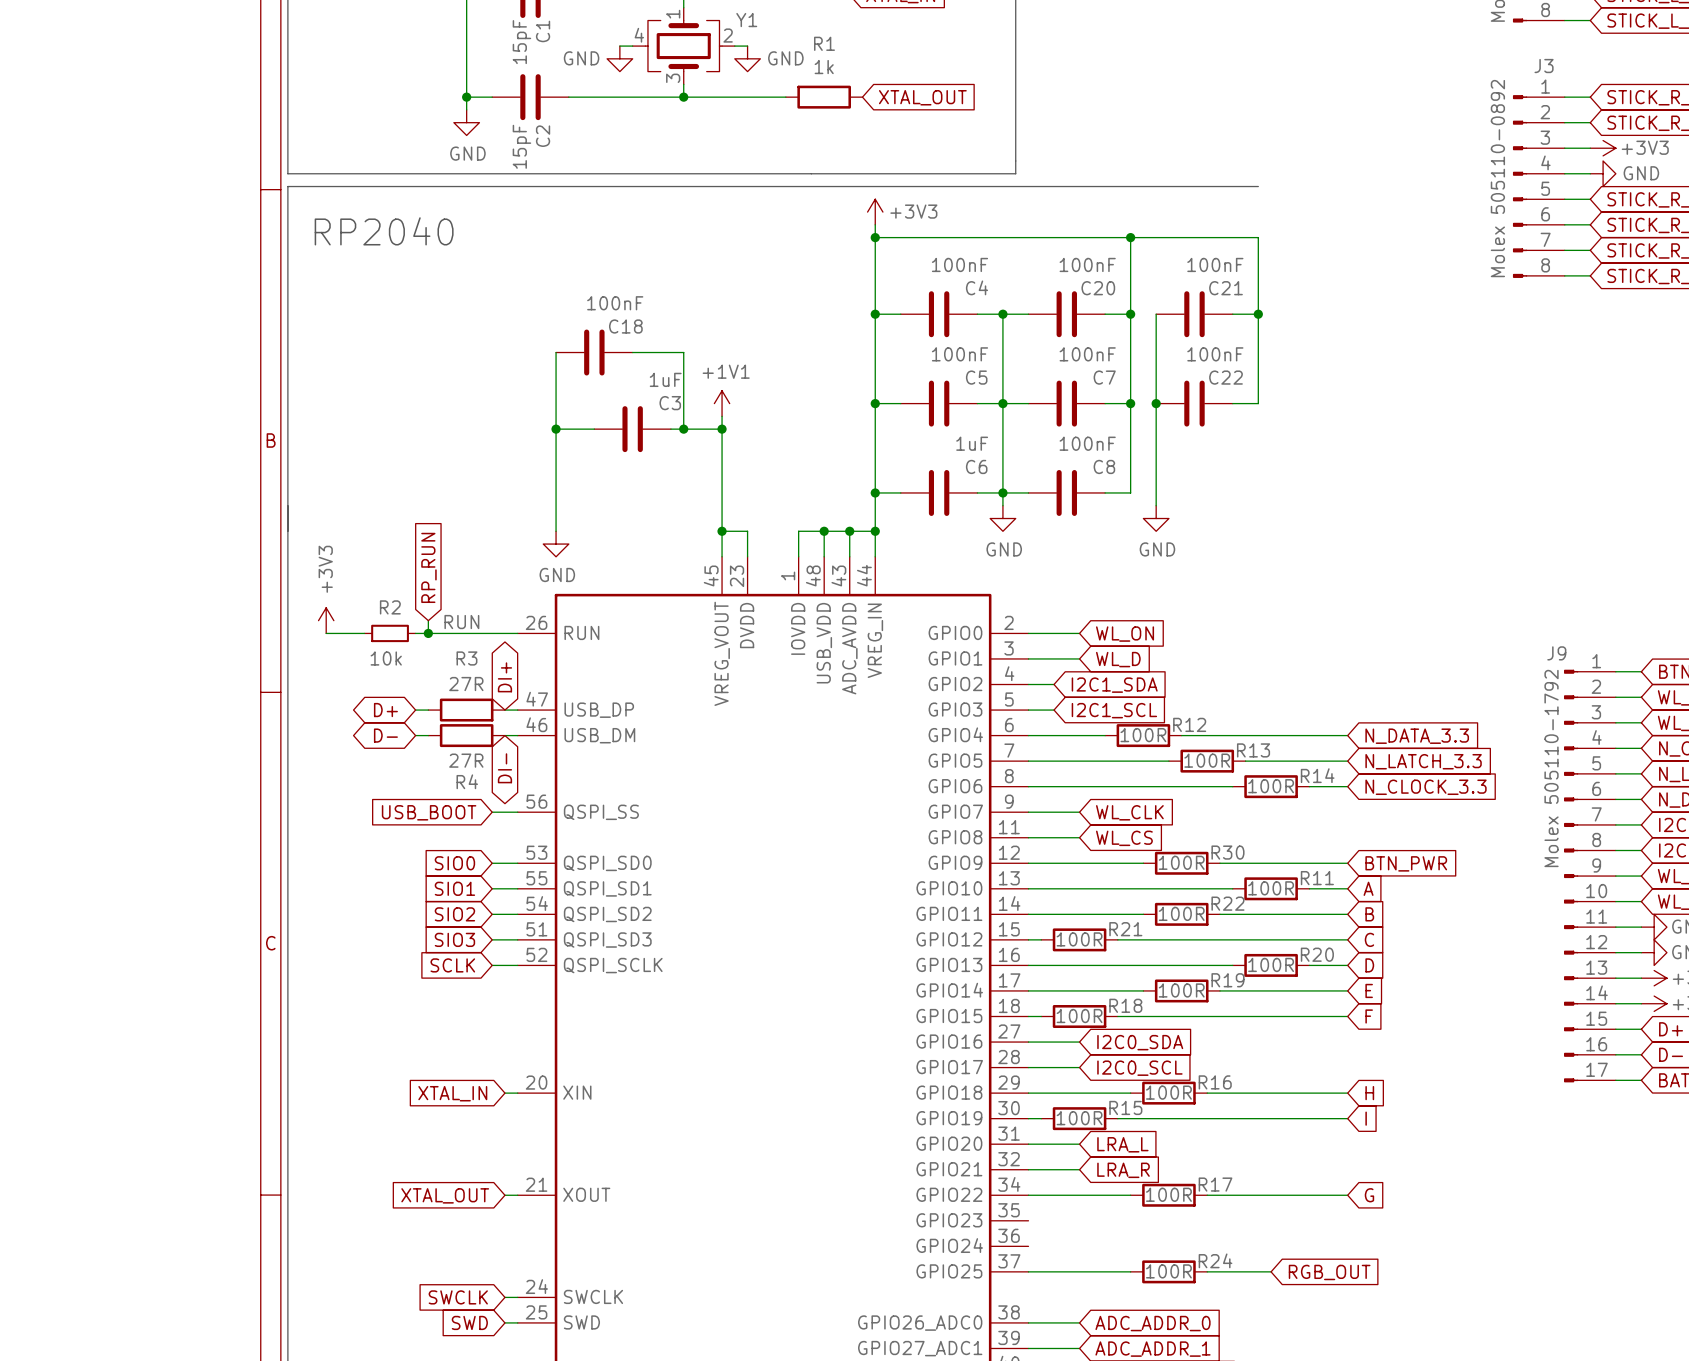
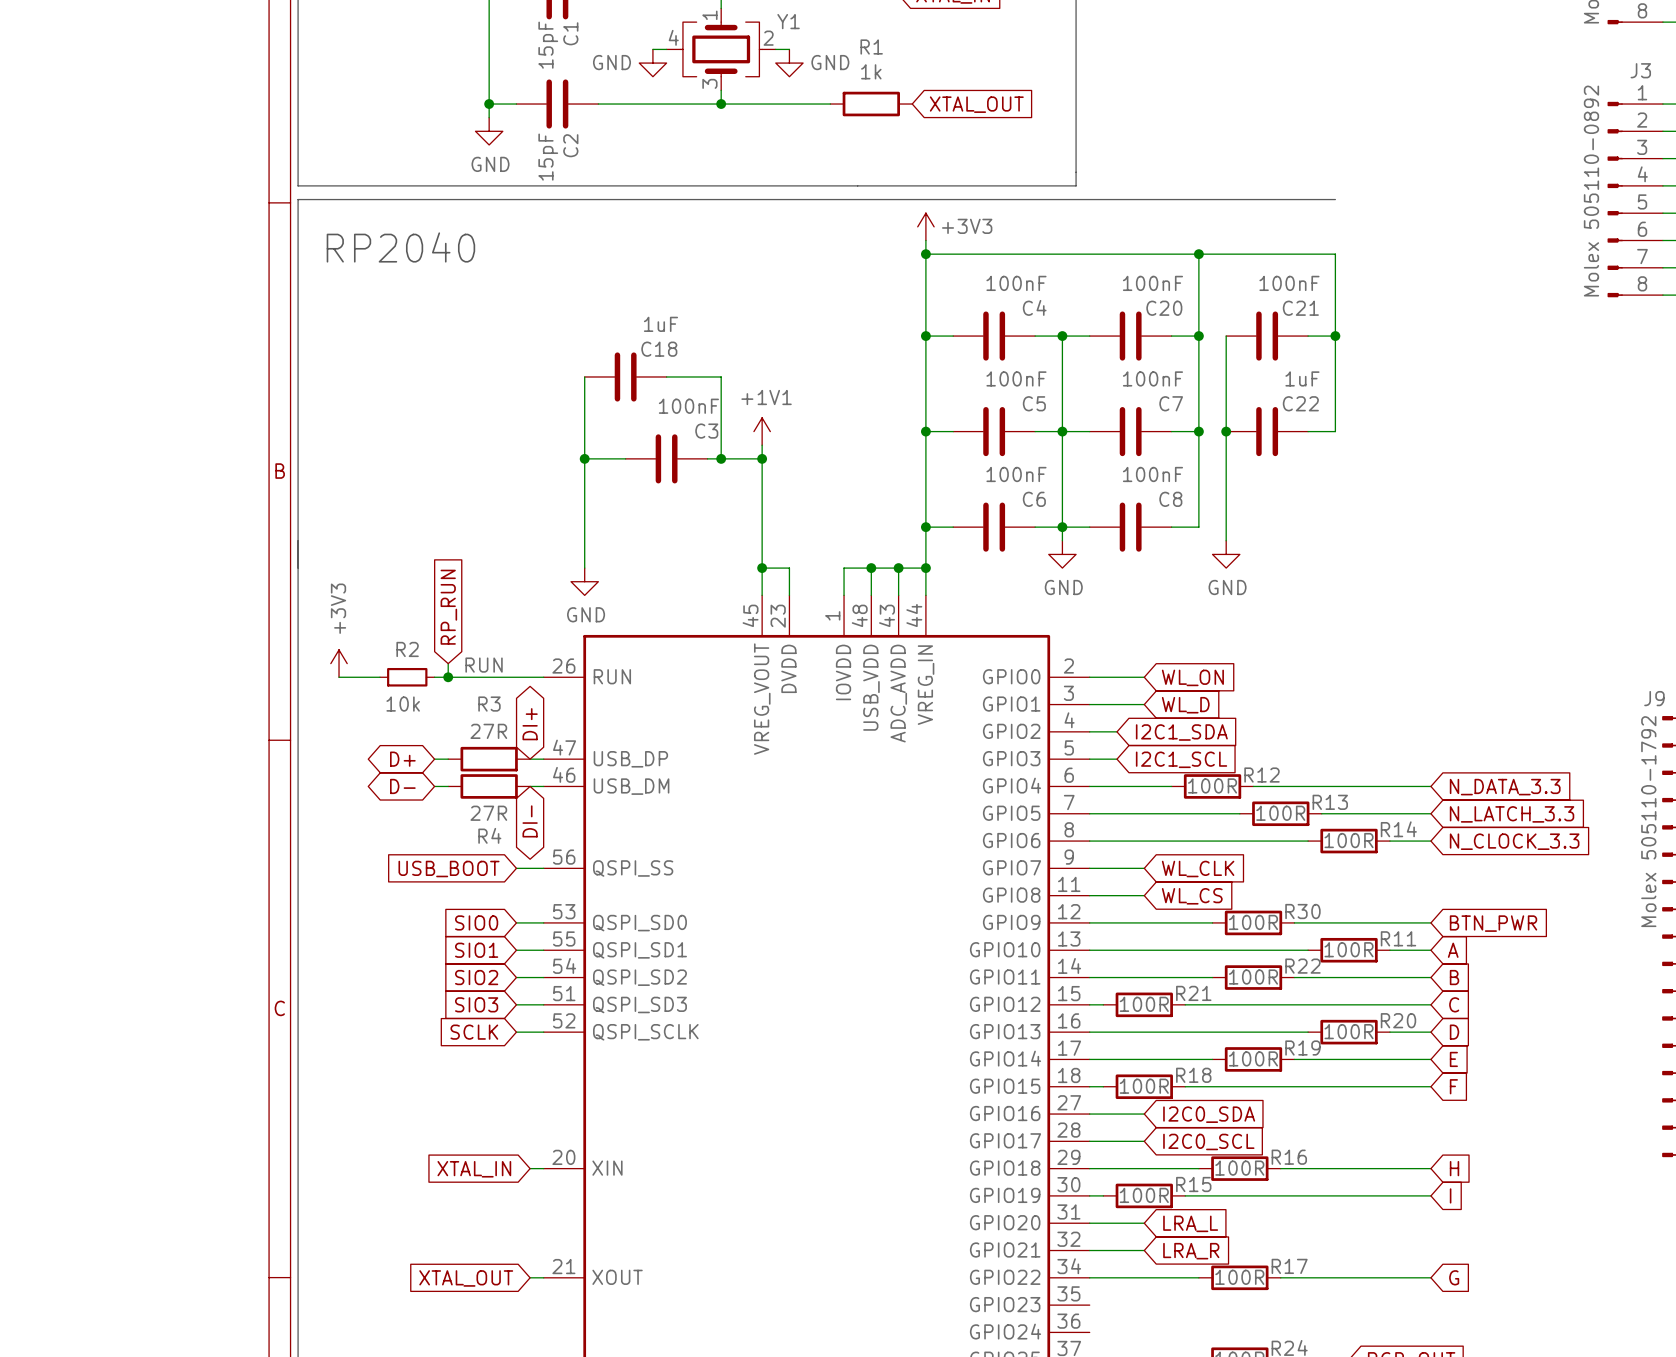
C18 value: 100nF (615, 303) -> 1uF (660, 324)
C22 value: 100nF (1215, 354) -> 1uF (1302, 378)
C3 value: 1uF (665, 379) -> 100nF (688, 406)
C6 value: 1uF (972, 443) -> 100nF (1016, 474)

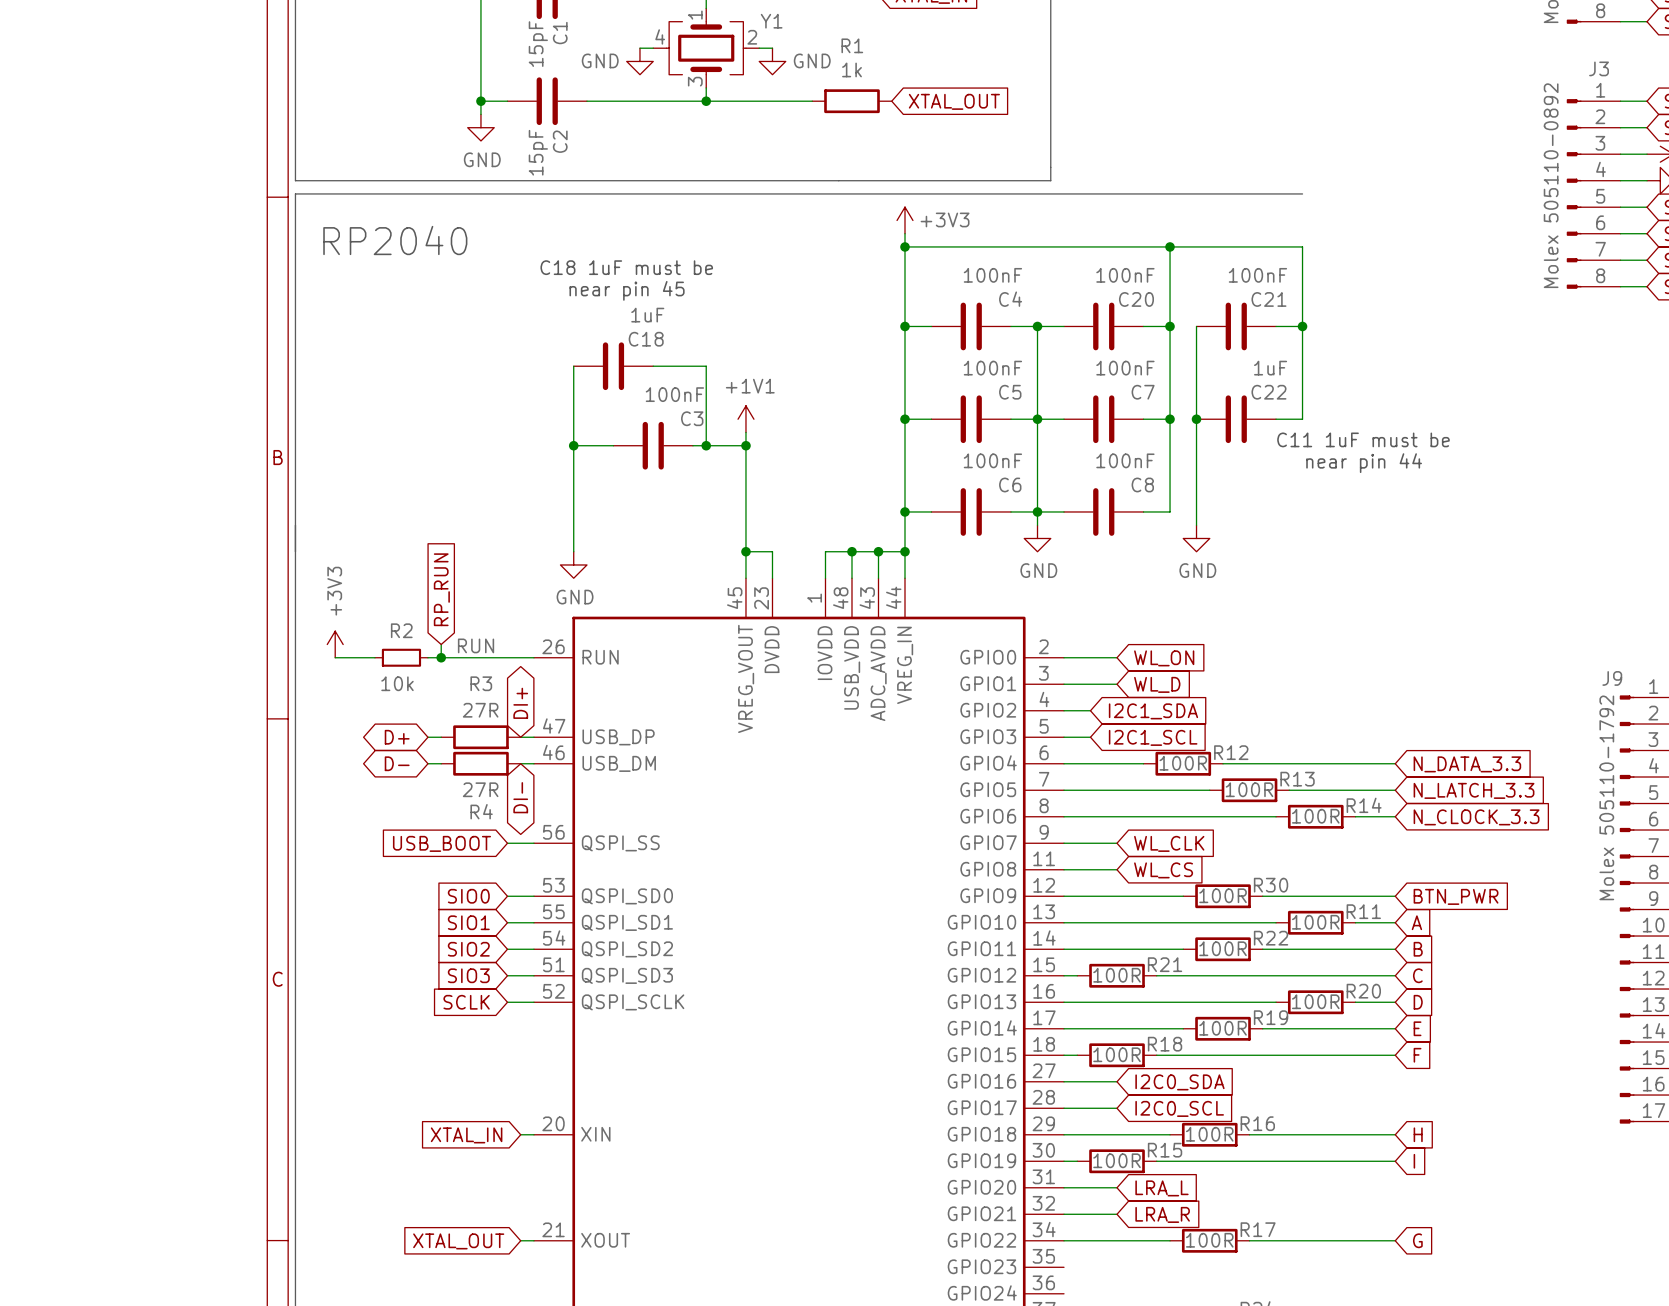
text: none -> C18 1uF must be (626, 267)
text: none -> near pin 45 (627, 290)
text: none -> C11 1uF must be (1363, 439)
text: none -> near pin 44 (1364, 463)

